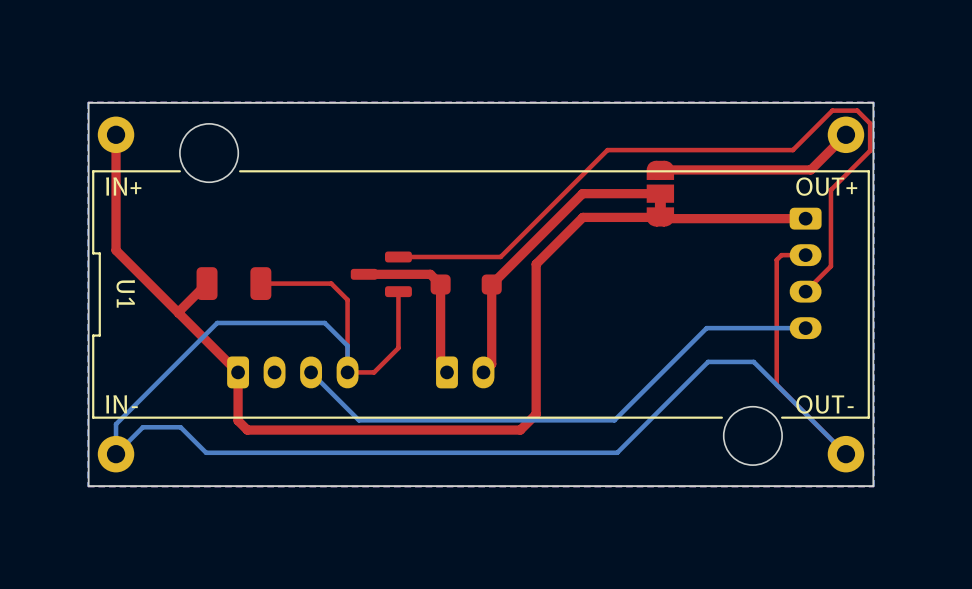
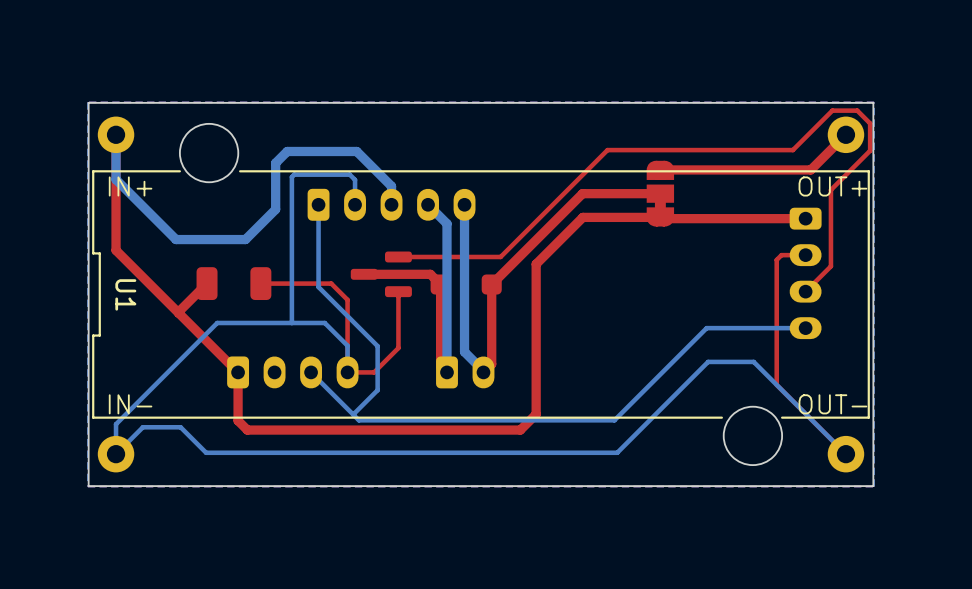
bottom track: none -> (116, 134) (116, 179) (176, 239) (245, 239) (275, 209) (275, 163) (287, 151) (356, 151) (391, 186) (391, 204)
bottom track: none -> (318, 204) (318, 287) (377, 346) (377, 390) (353, 414)
bottom track: none -> (355, 204) (355, 179) (349, 174) (294, 174) (291, 176) (291, 322)
part: none -> (391, 204)
bottom track: none -> (428, 204) (446, 223) (446, 372)
bottom track: none -> (464, 204) (464, 351) (483, 372)

